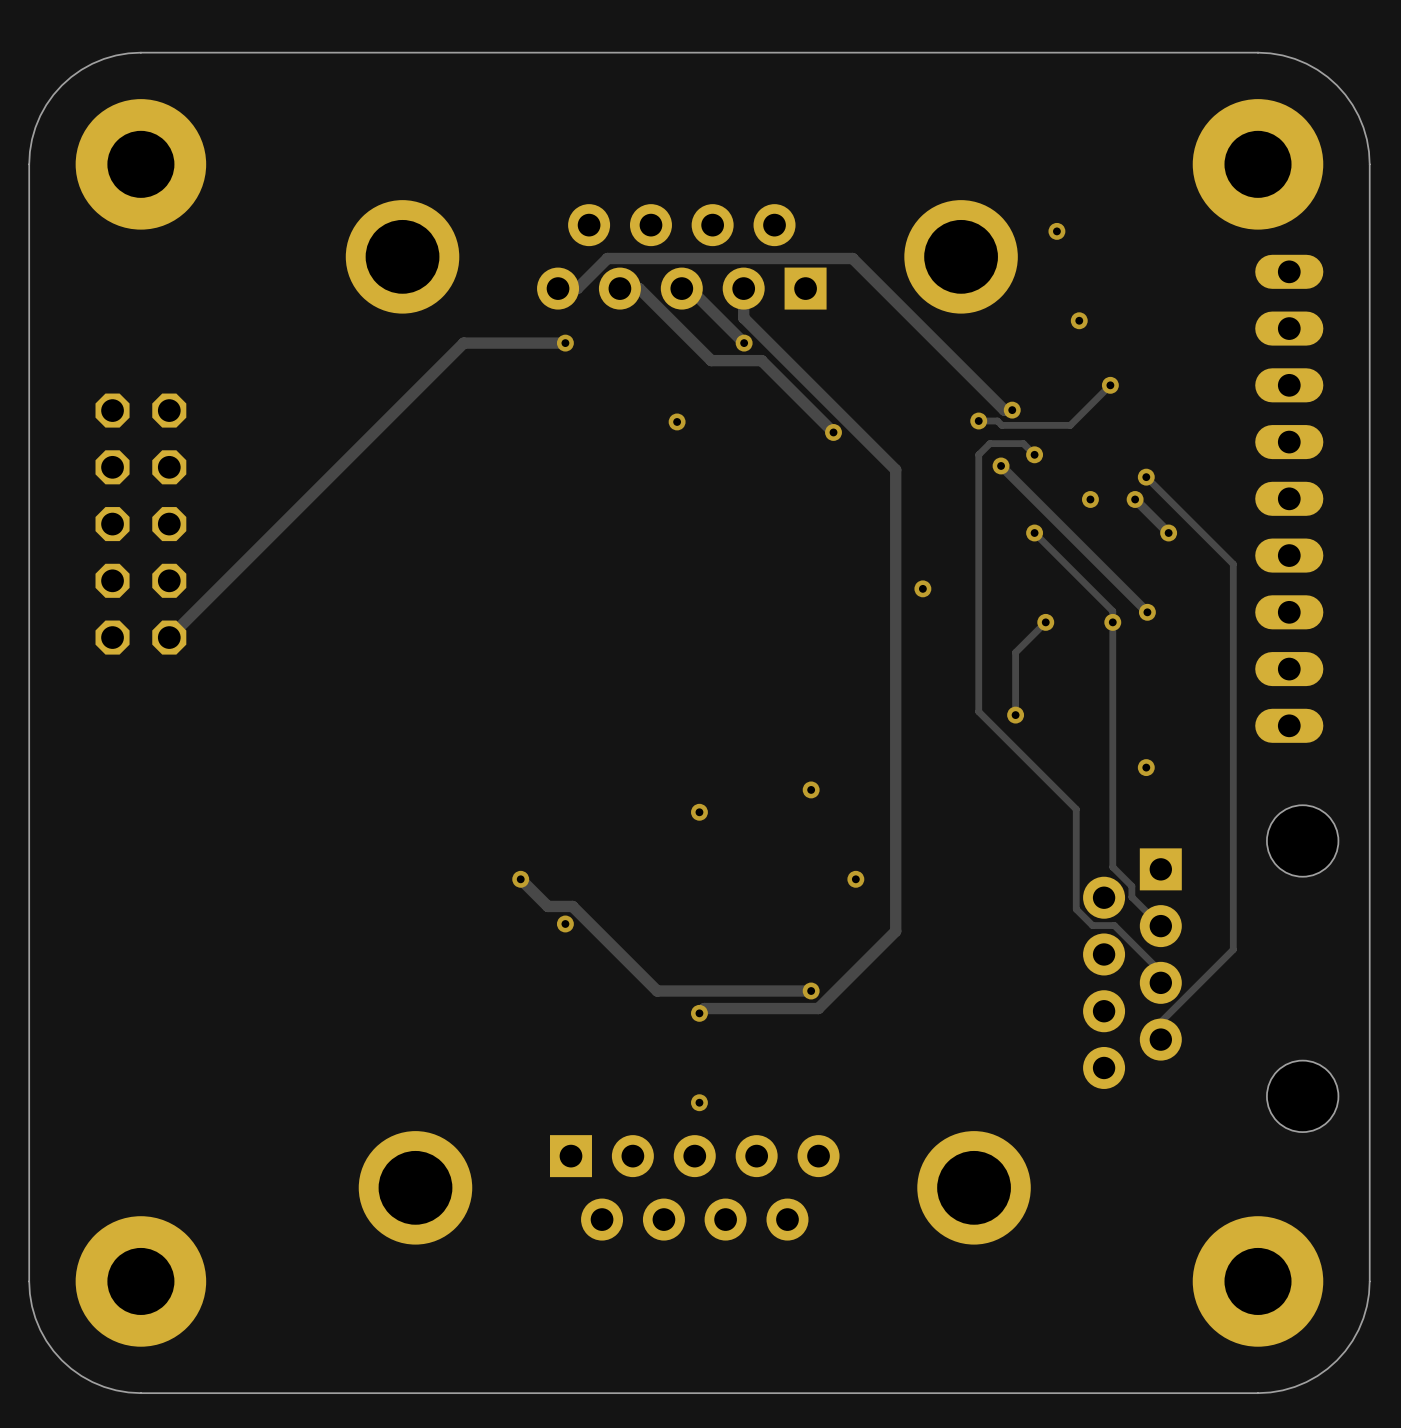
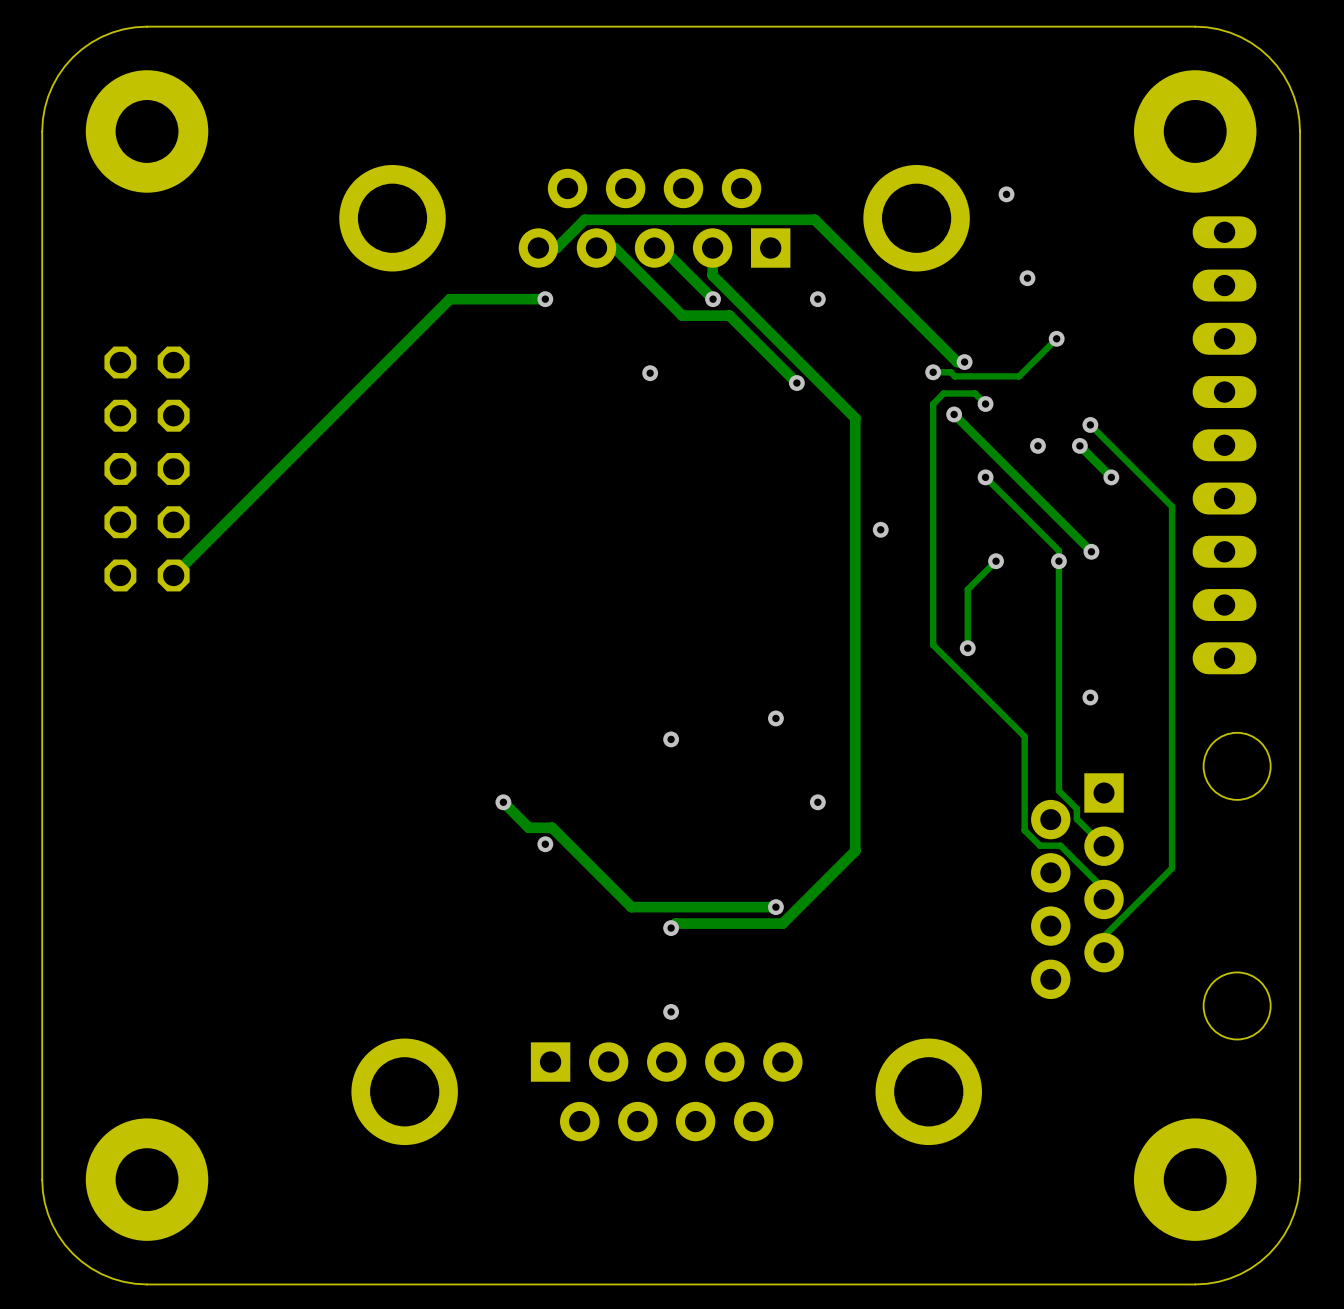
via: none -> (817, 299)

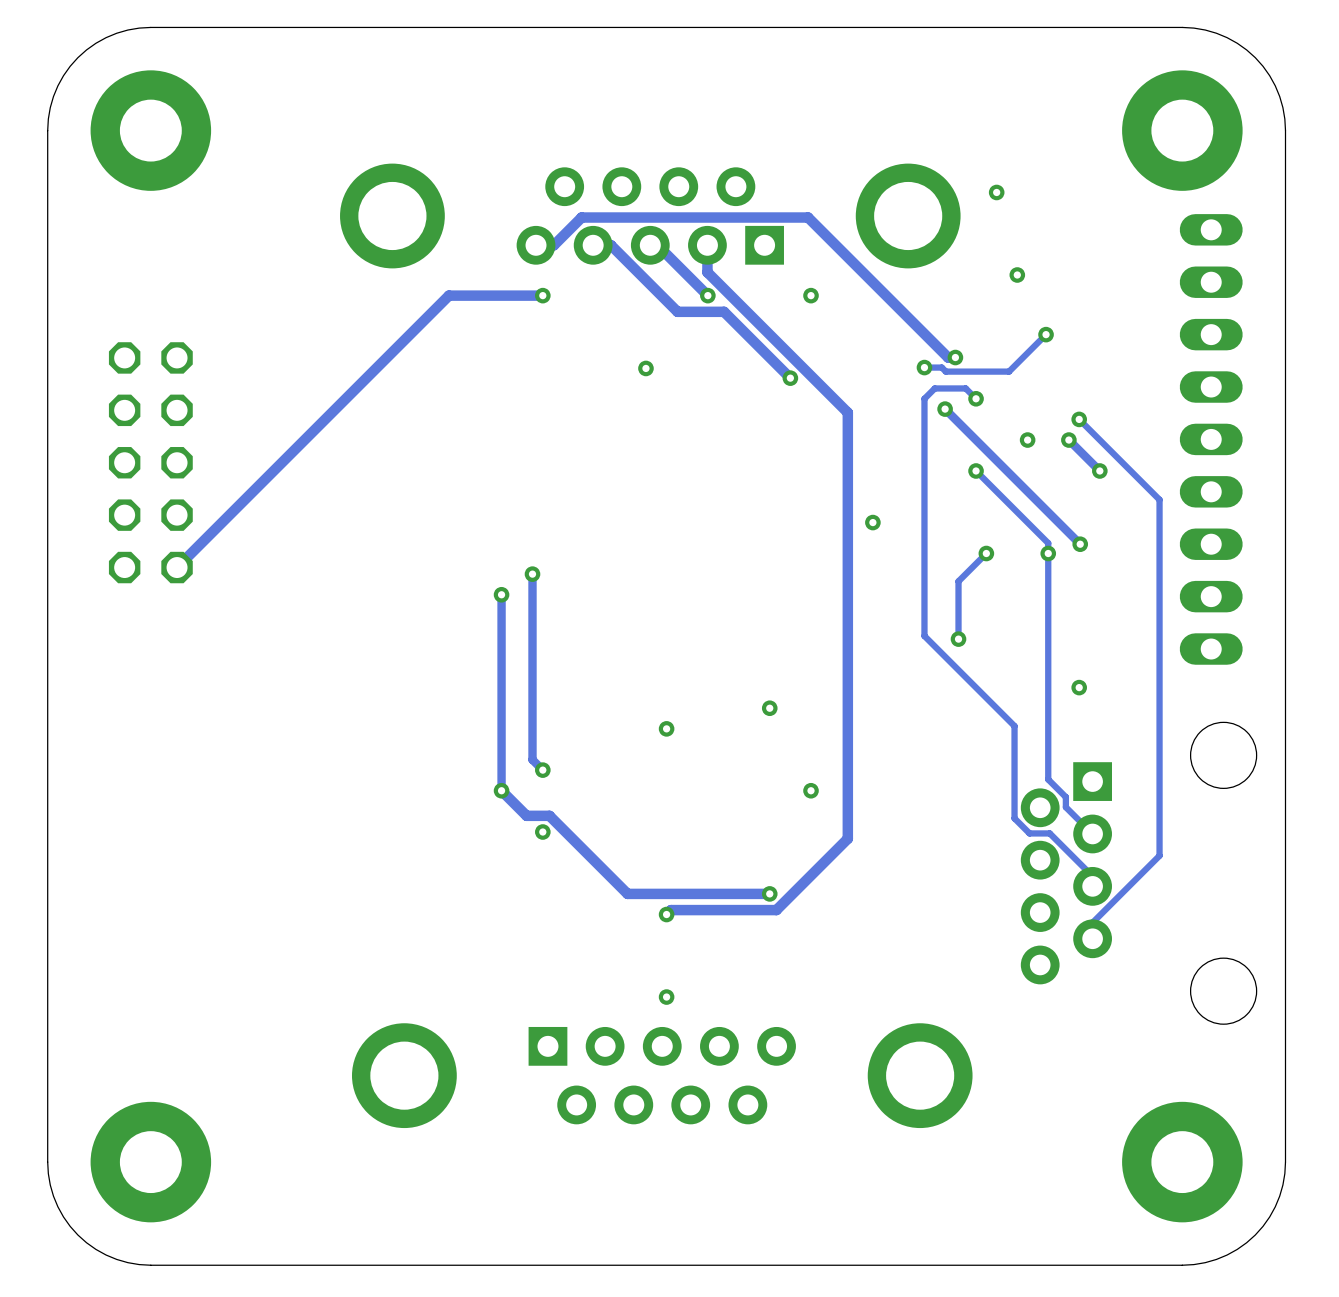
track: none -> (532, 574) (532, 759) (542, 770)
via: none -> (532, 574)
track: none -> (501, 594) (501, 790)
via: none -> (501, 594)
via: none -> (542, 770)

